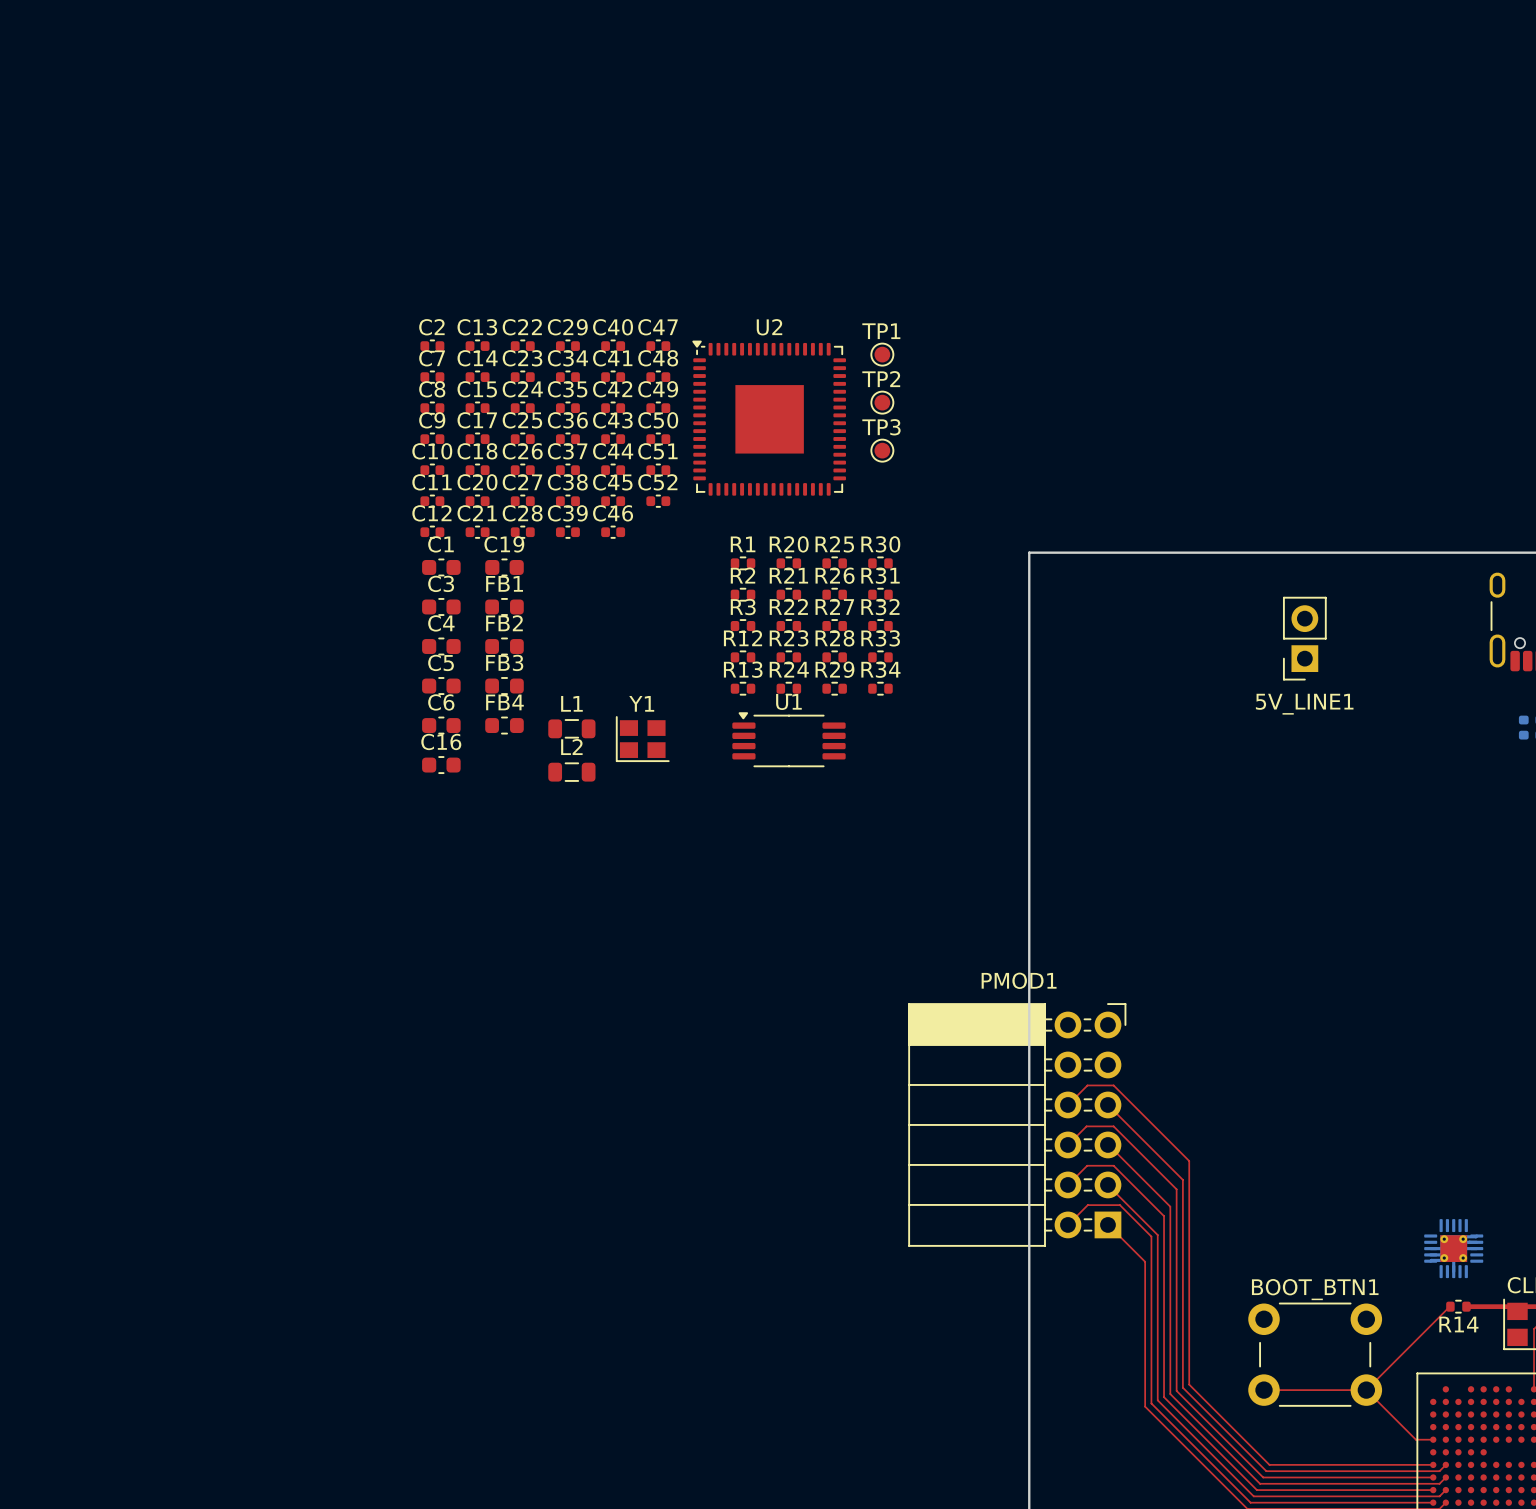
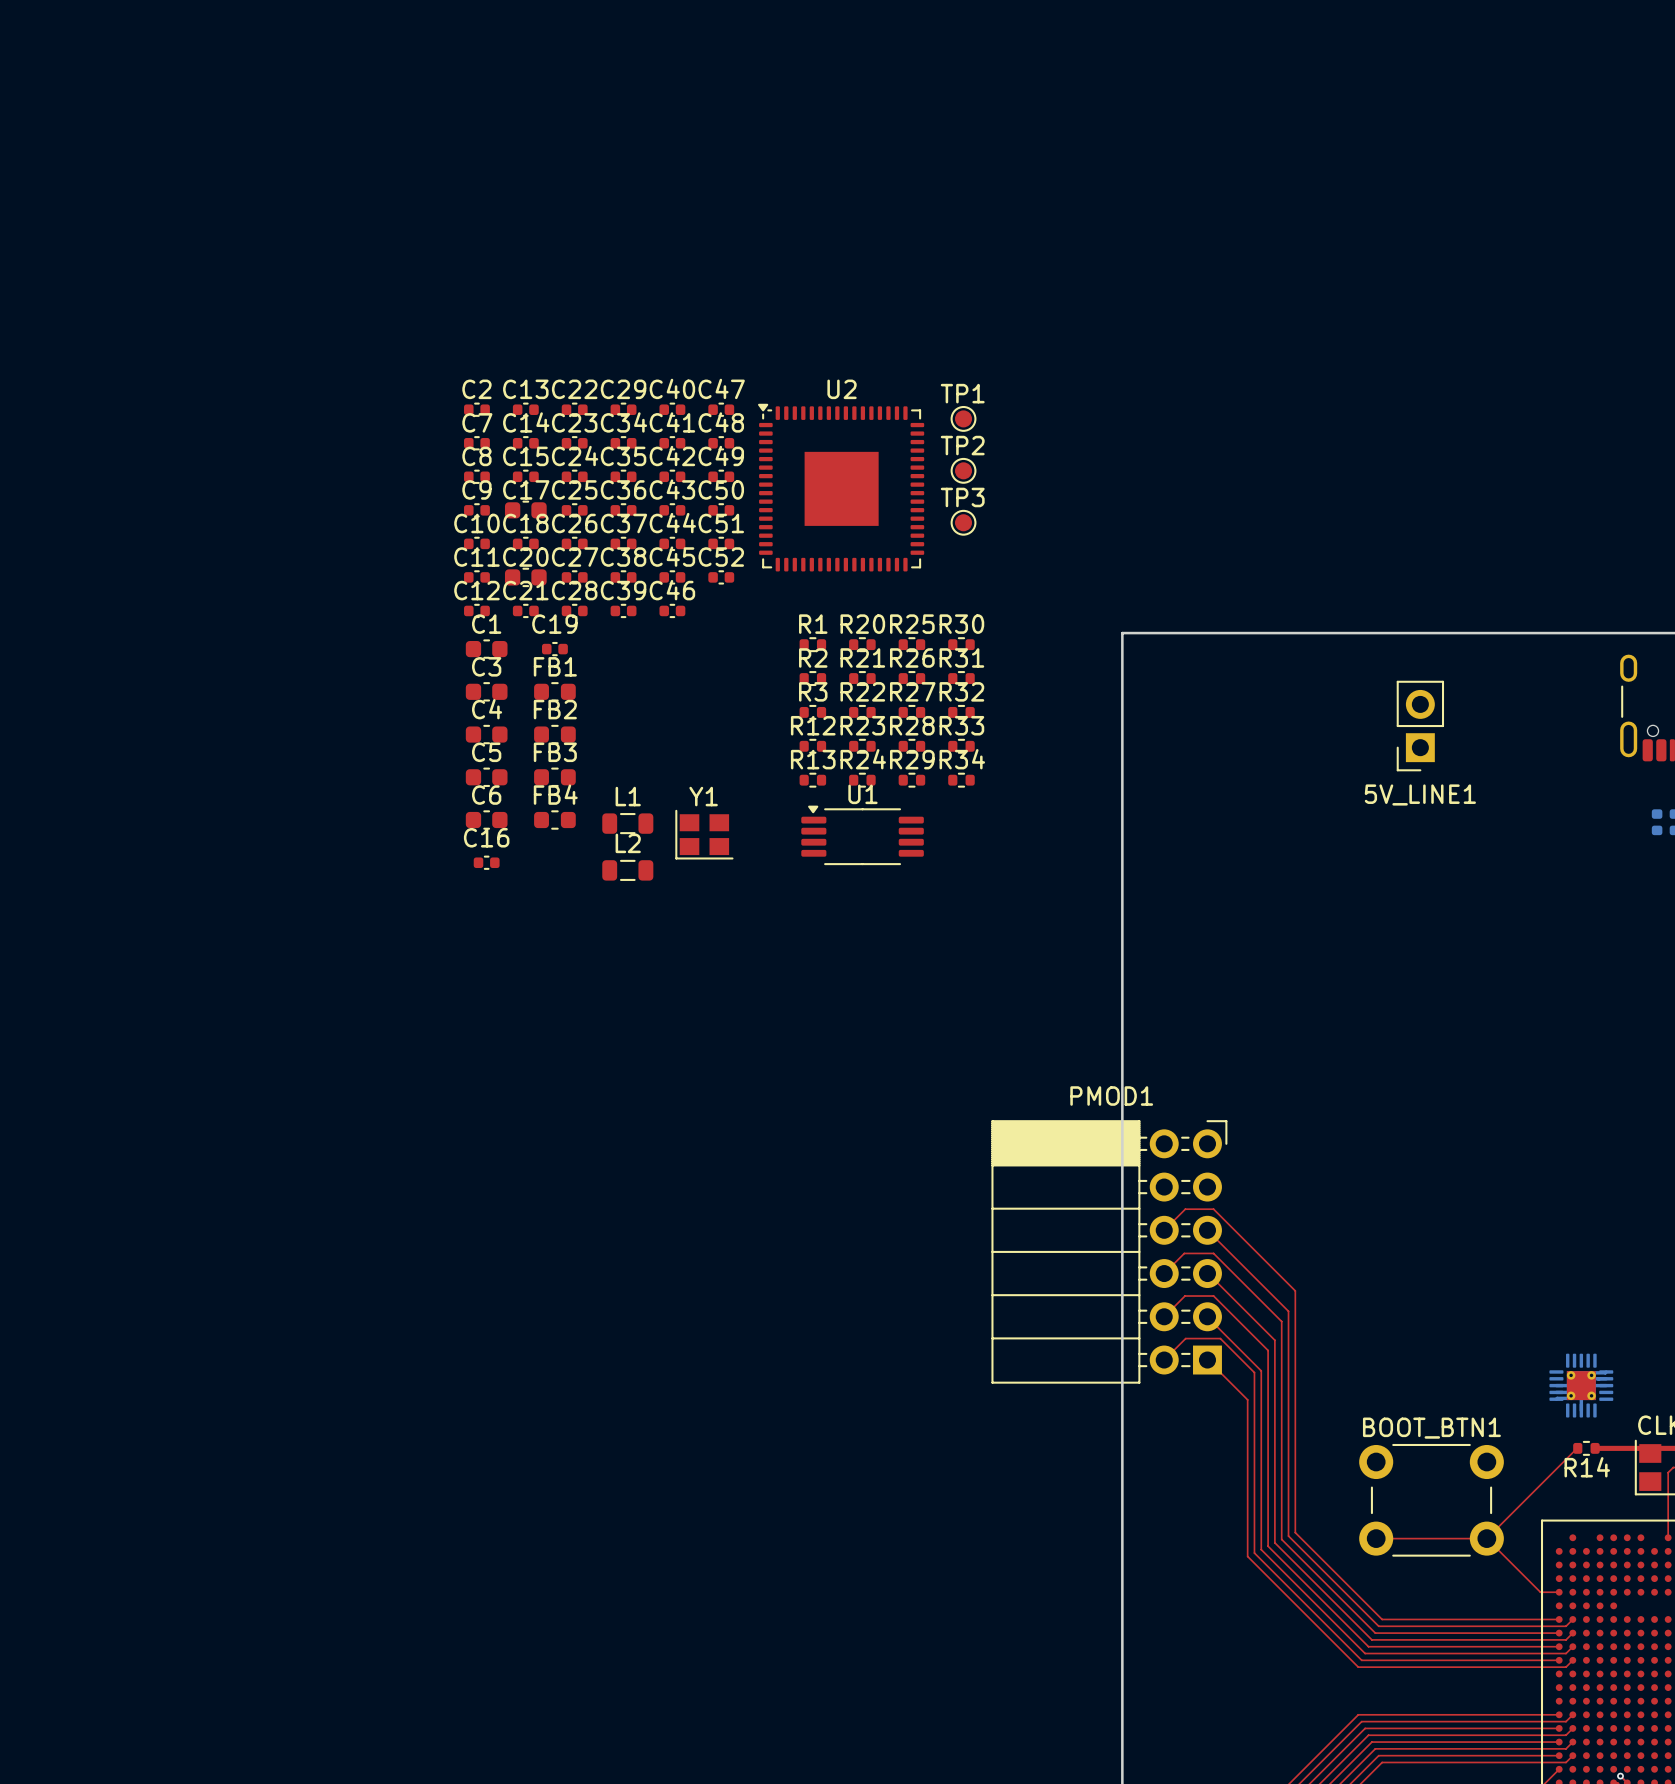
C17 footprint: [465, 432, 490, 446] -> [504, 500, 547, 521]
C20 footprint: [465, 494, 490, 508] -> [504, 567, 547, 588]
C19 footprint: [485, 558, 524, 577] -> [541, 641, 568, 657]
C16 footprint: [422, 756, 461, 775] -> [473, 855, 500, 870]

